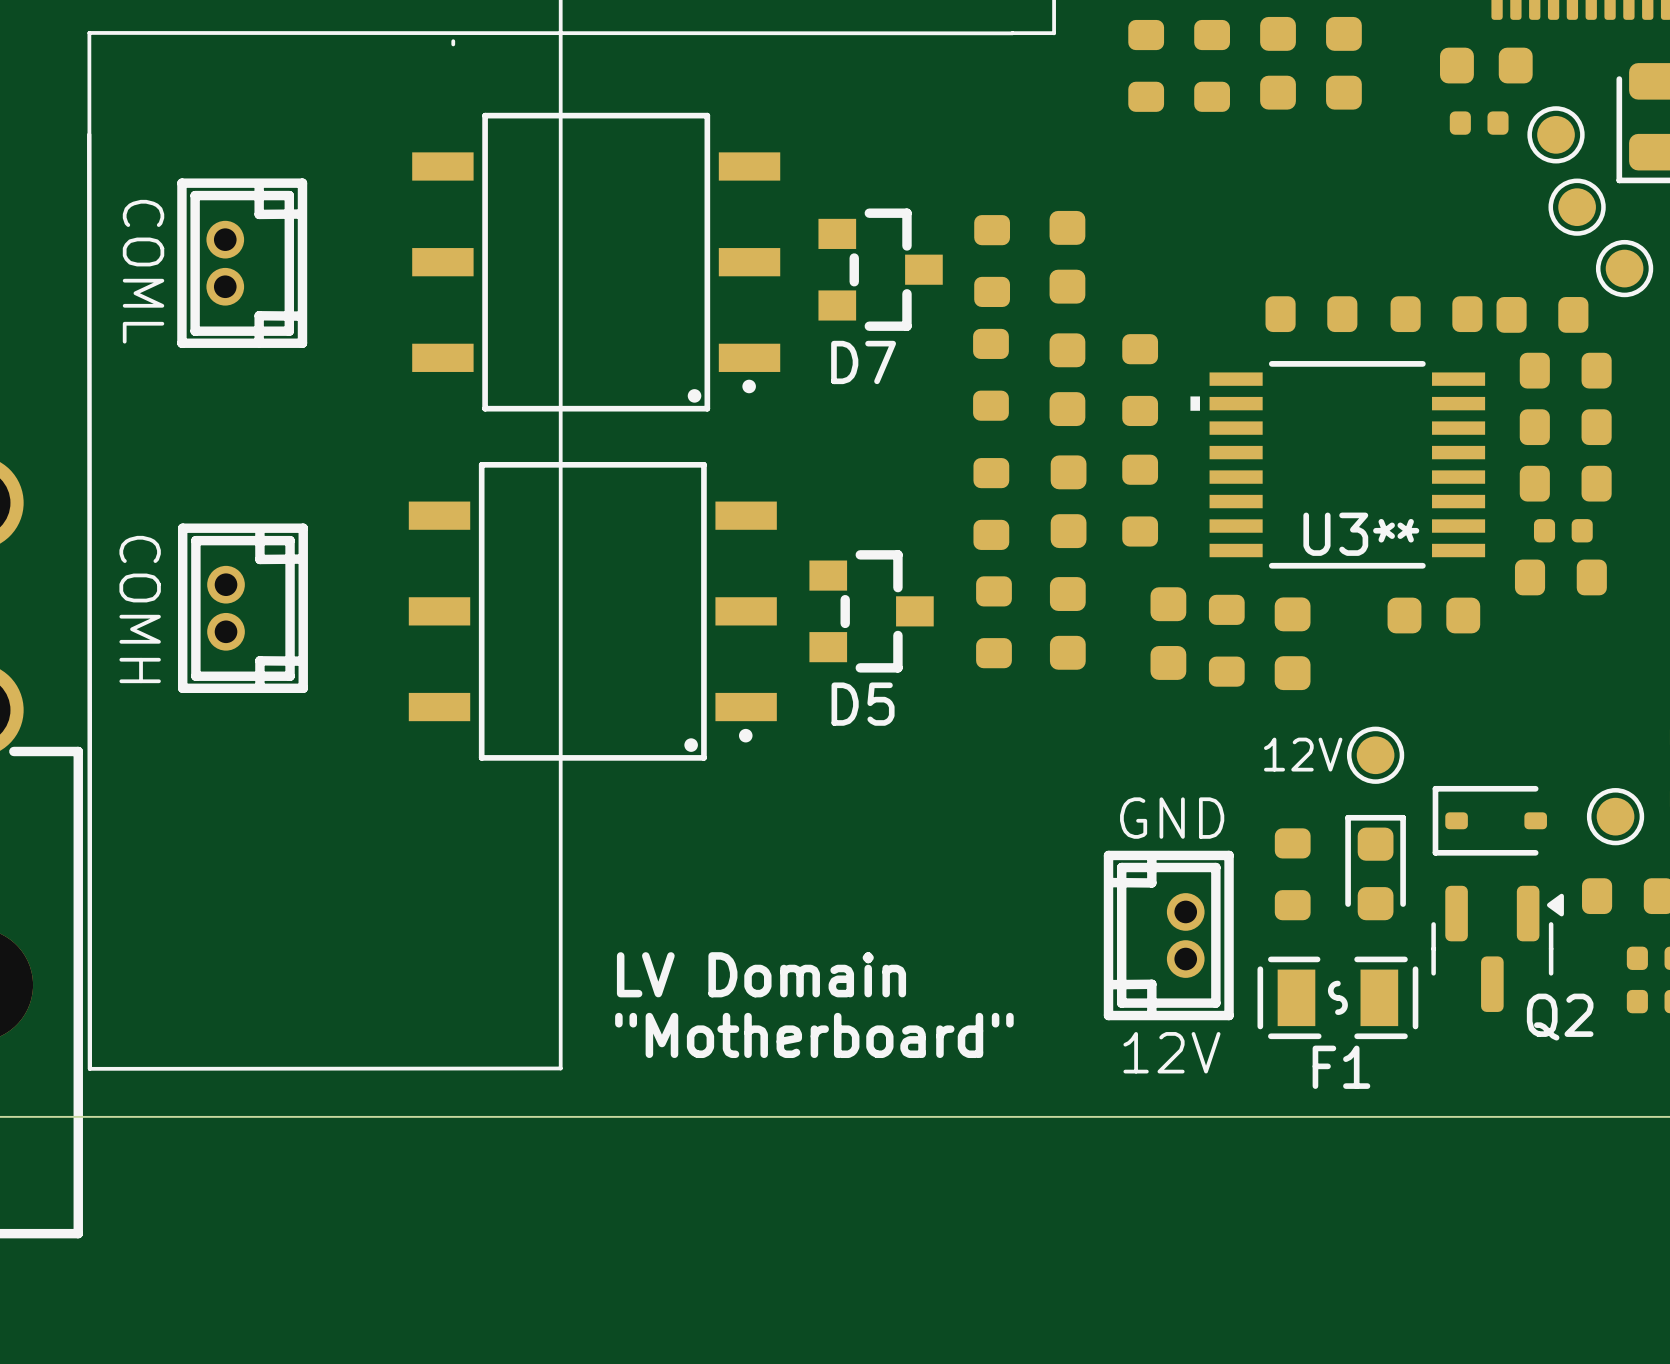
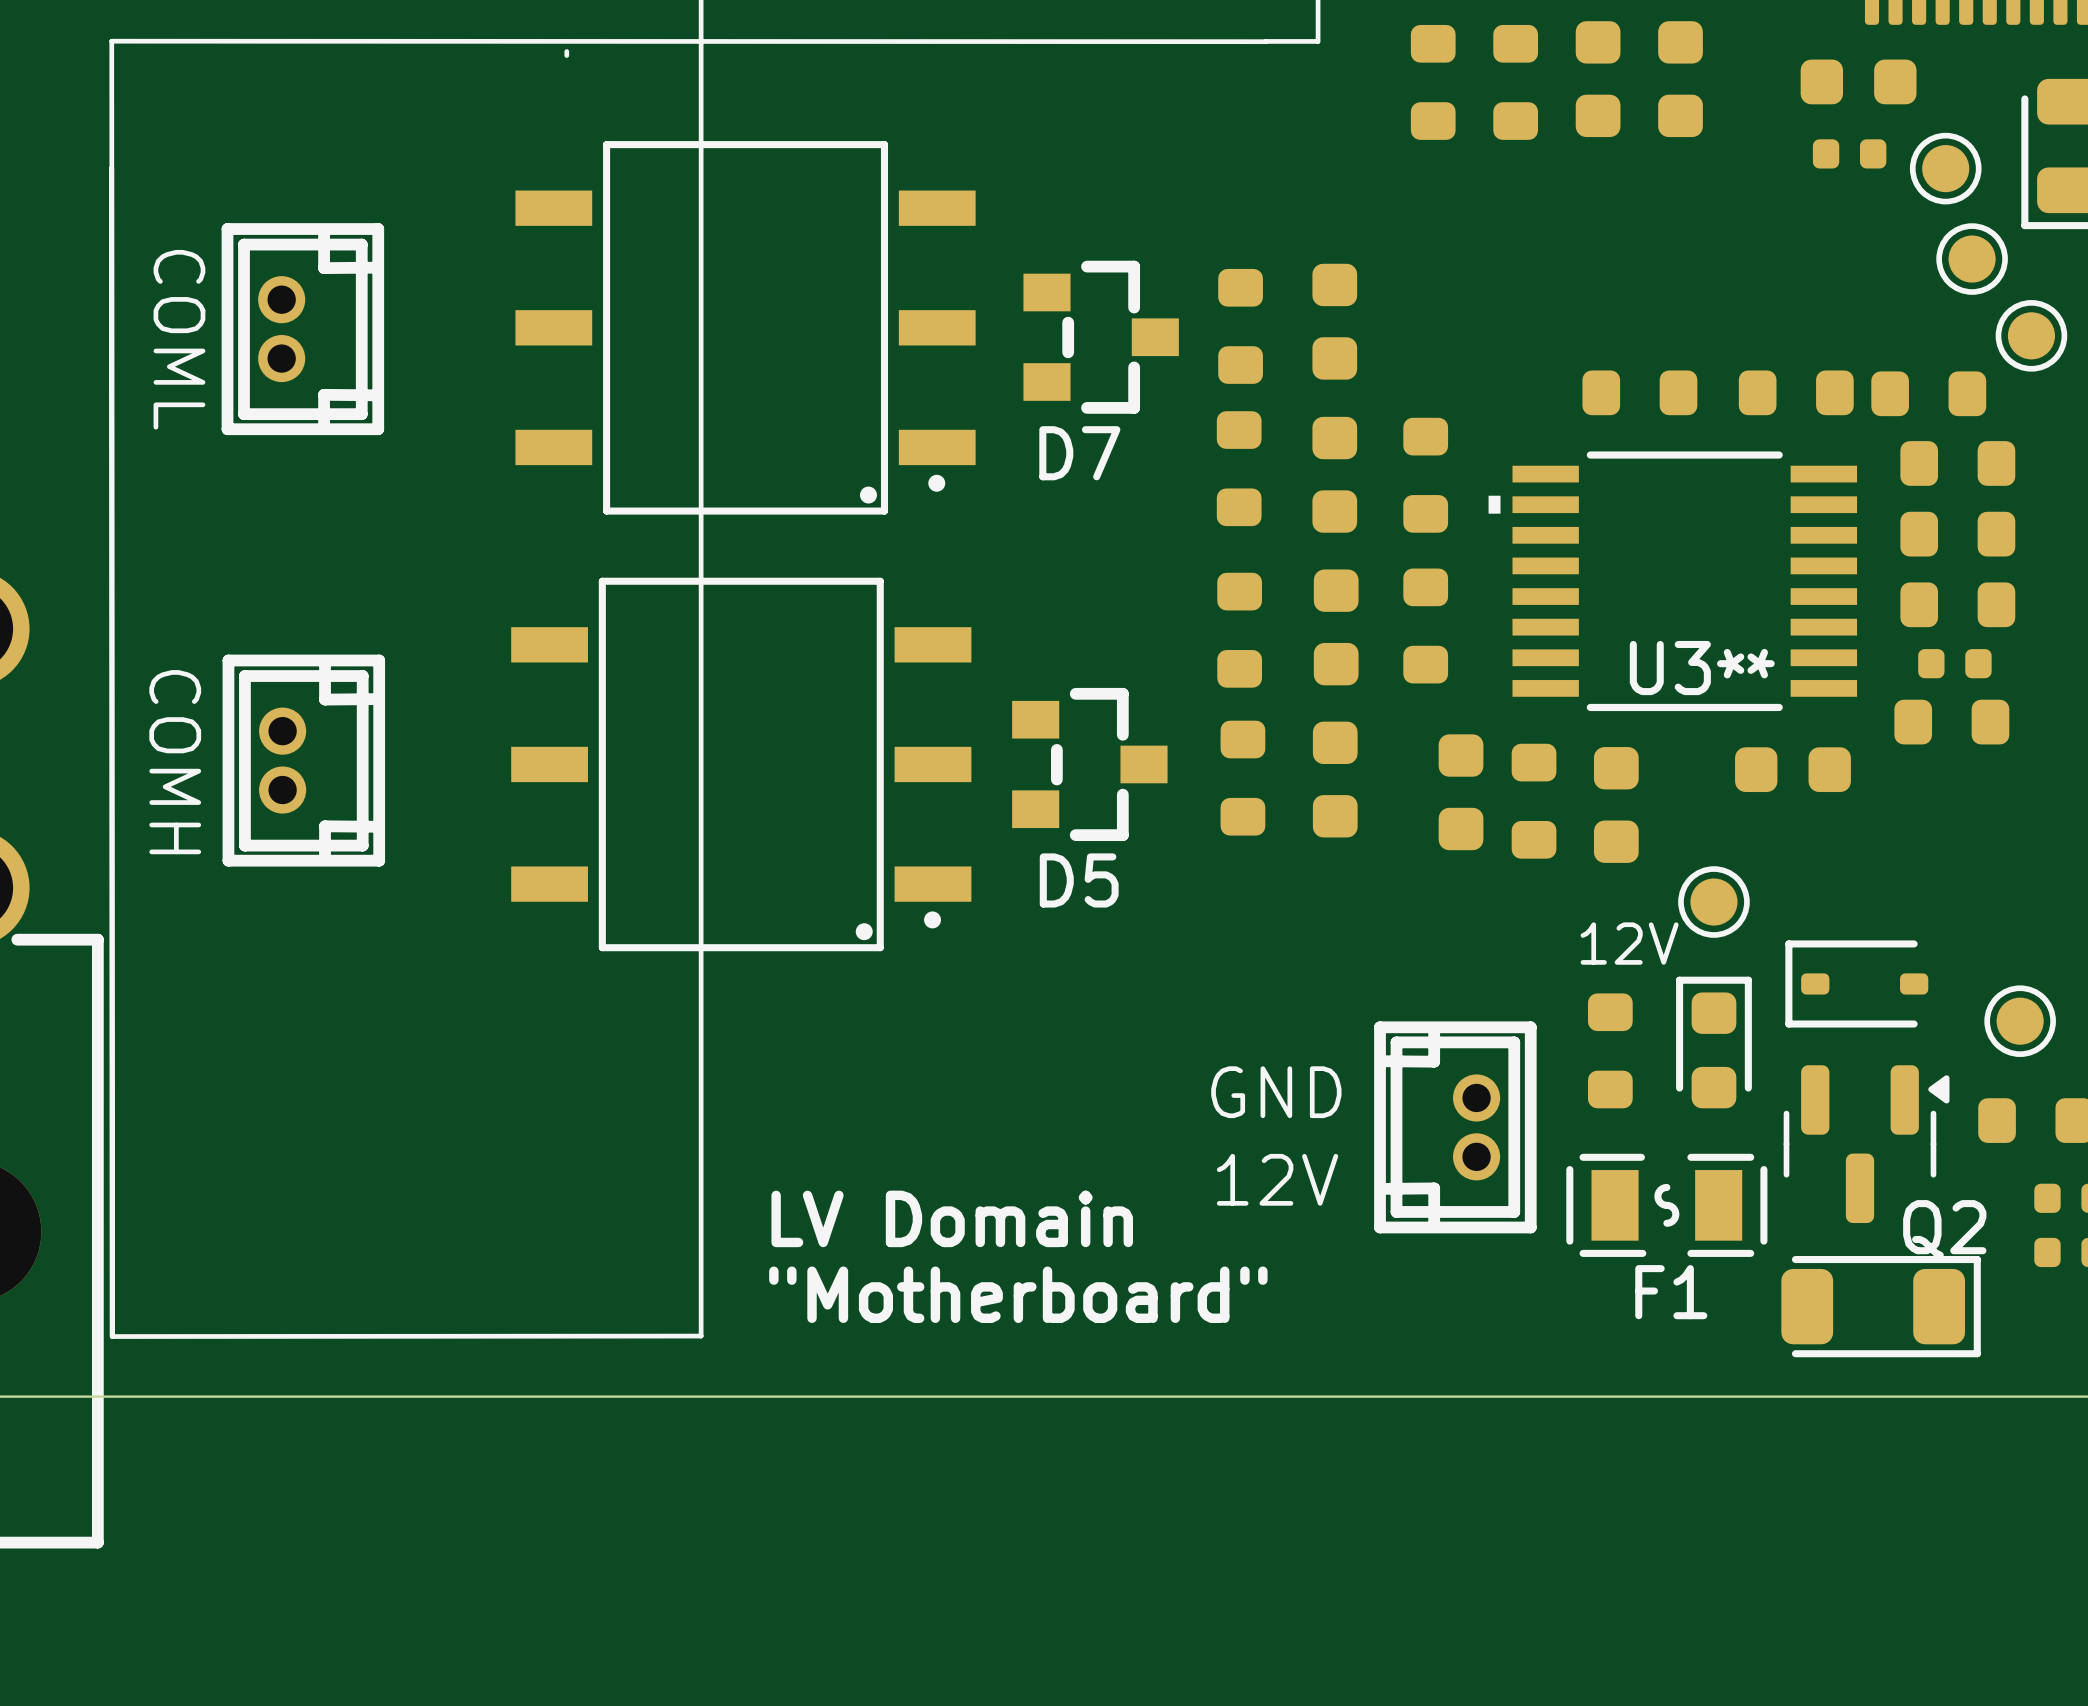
part position: (1375, 755) -> (1713, 902)
text position: GND (1172, 818) -> GND (1276, 1092)
part position: (1489, 820) -> (1856, 983)
part position: (1375, 867) -> (1713, 1042)
part position: (1292, 874) -> (1610, 1050)
part position: (1168, 935) -> (1455, 1127)
Q2 position: (1497, 948) -> (1866, 1144)
F1 position: (1337, 997) -> (1666, 1205)
part: none -> (1881, 1306)
text position: 12V (1171, 1052) -> 12V (1277, 1179)

